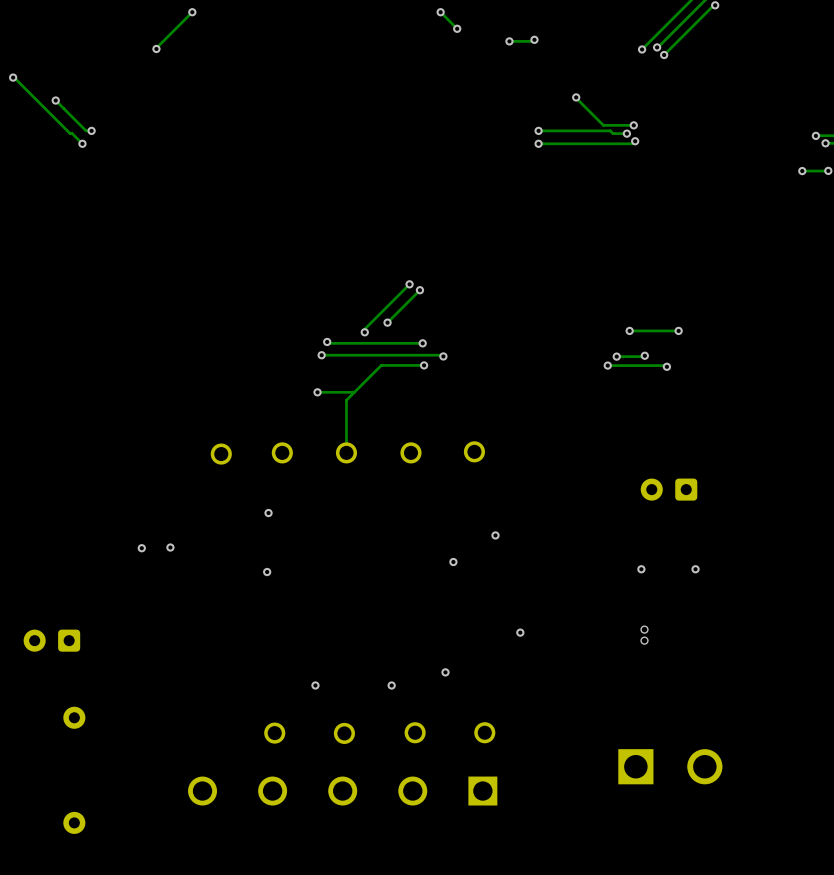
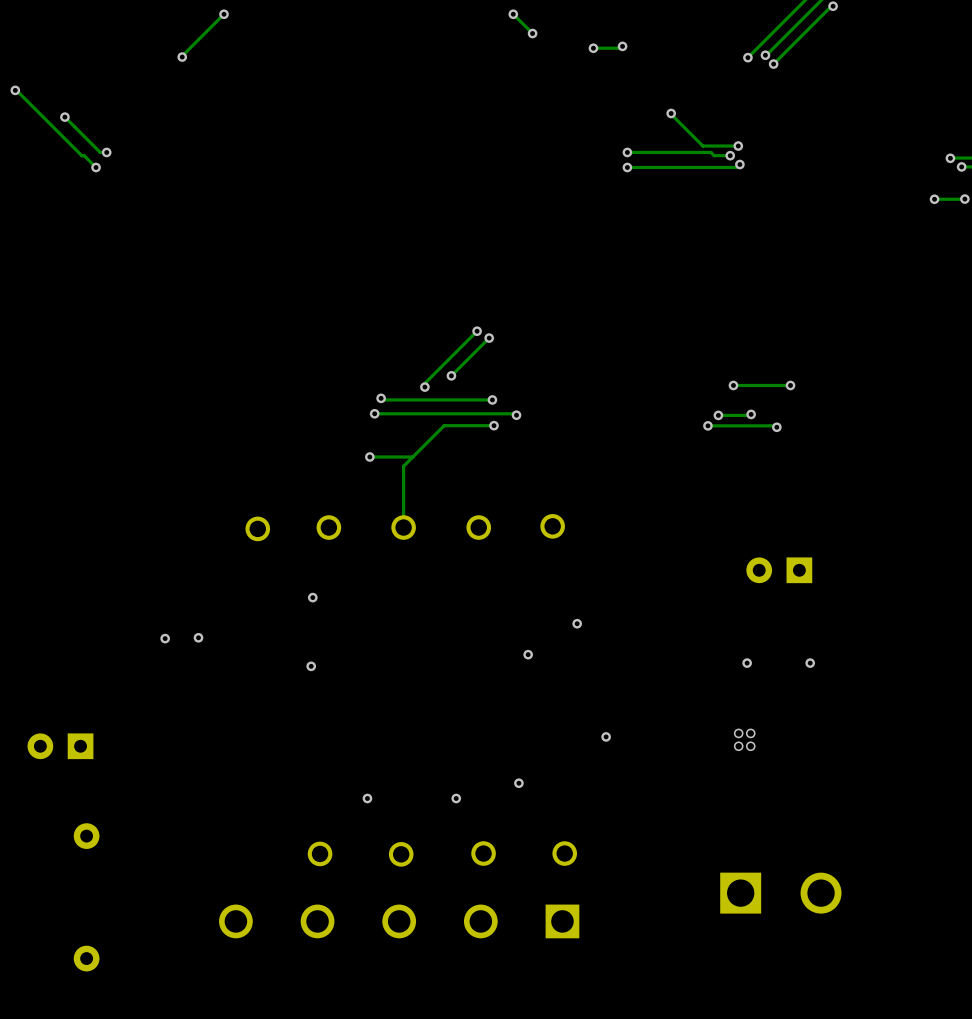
part footprint: [640, 478, 698, 501] -> [746, 557, 813, 584]
part footprint: [23, 629, 81, 652] -> [27, 733, 94, 760]
via: none -> (738, 733)
via: none -> (738, 746)

